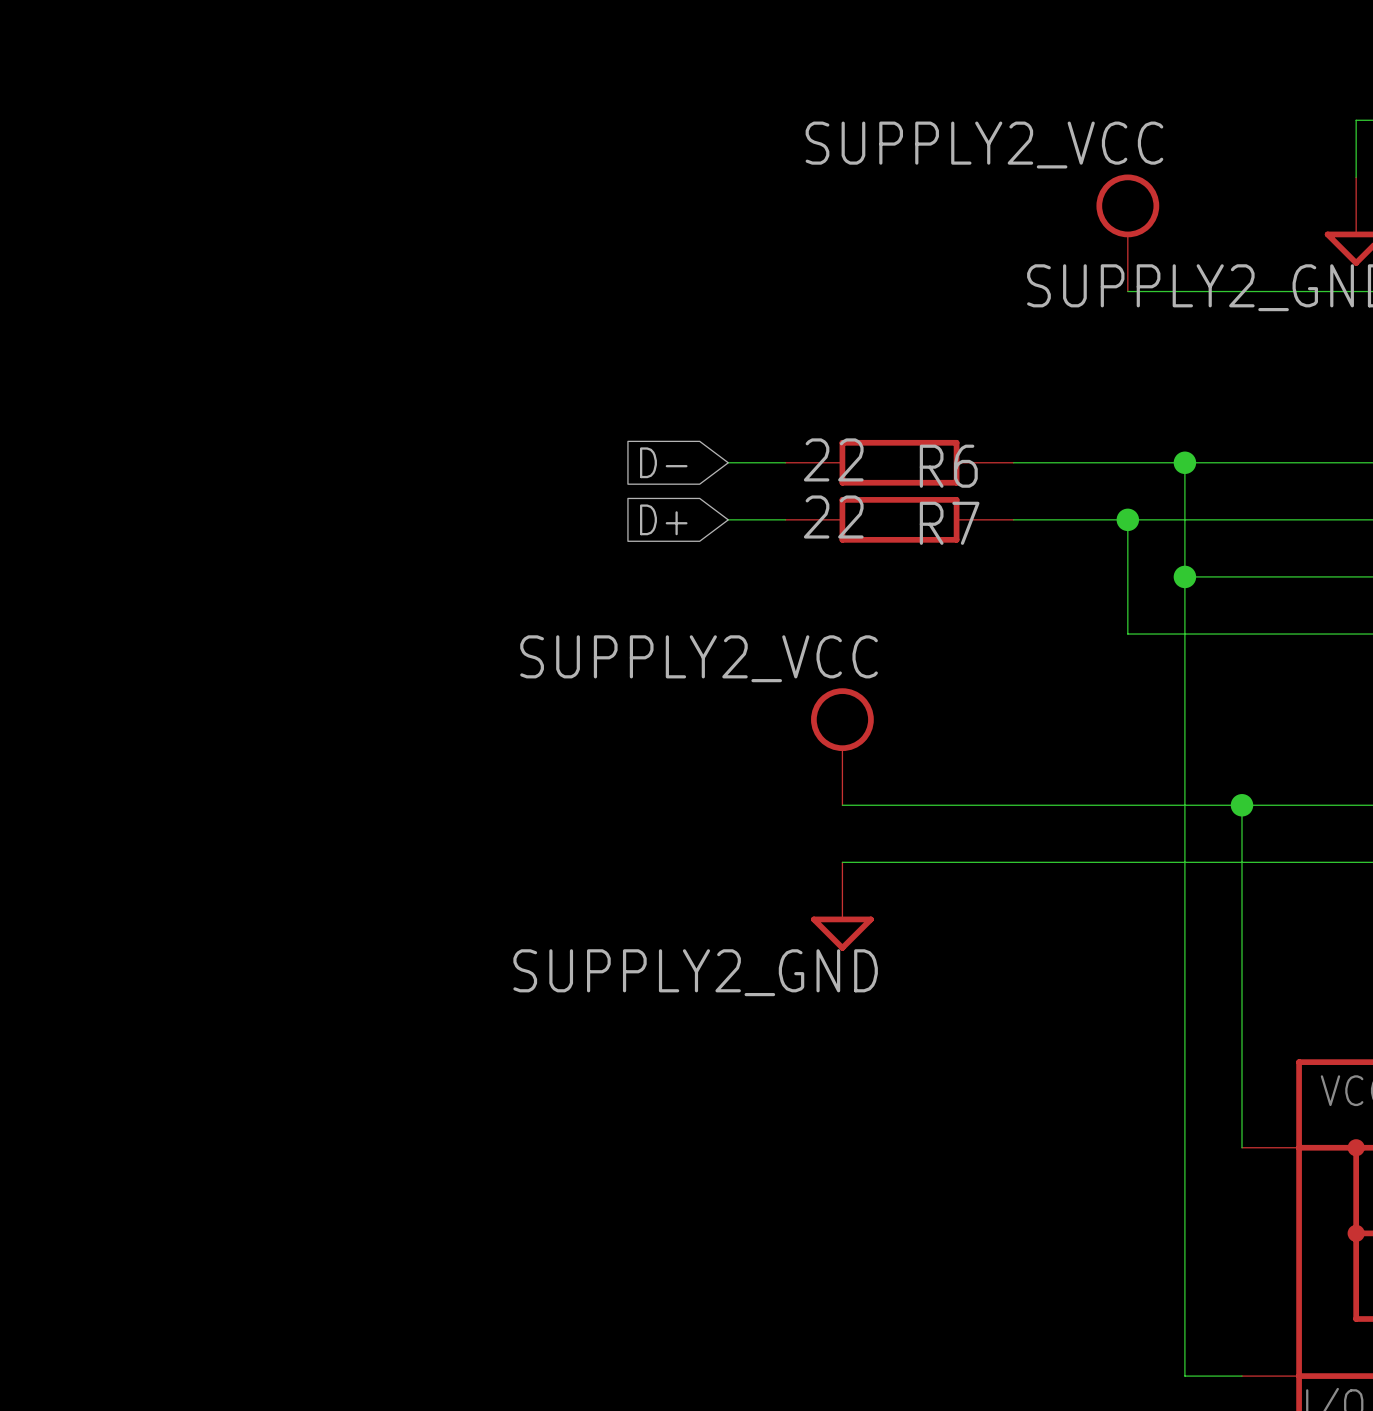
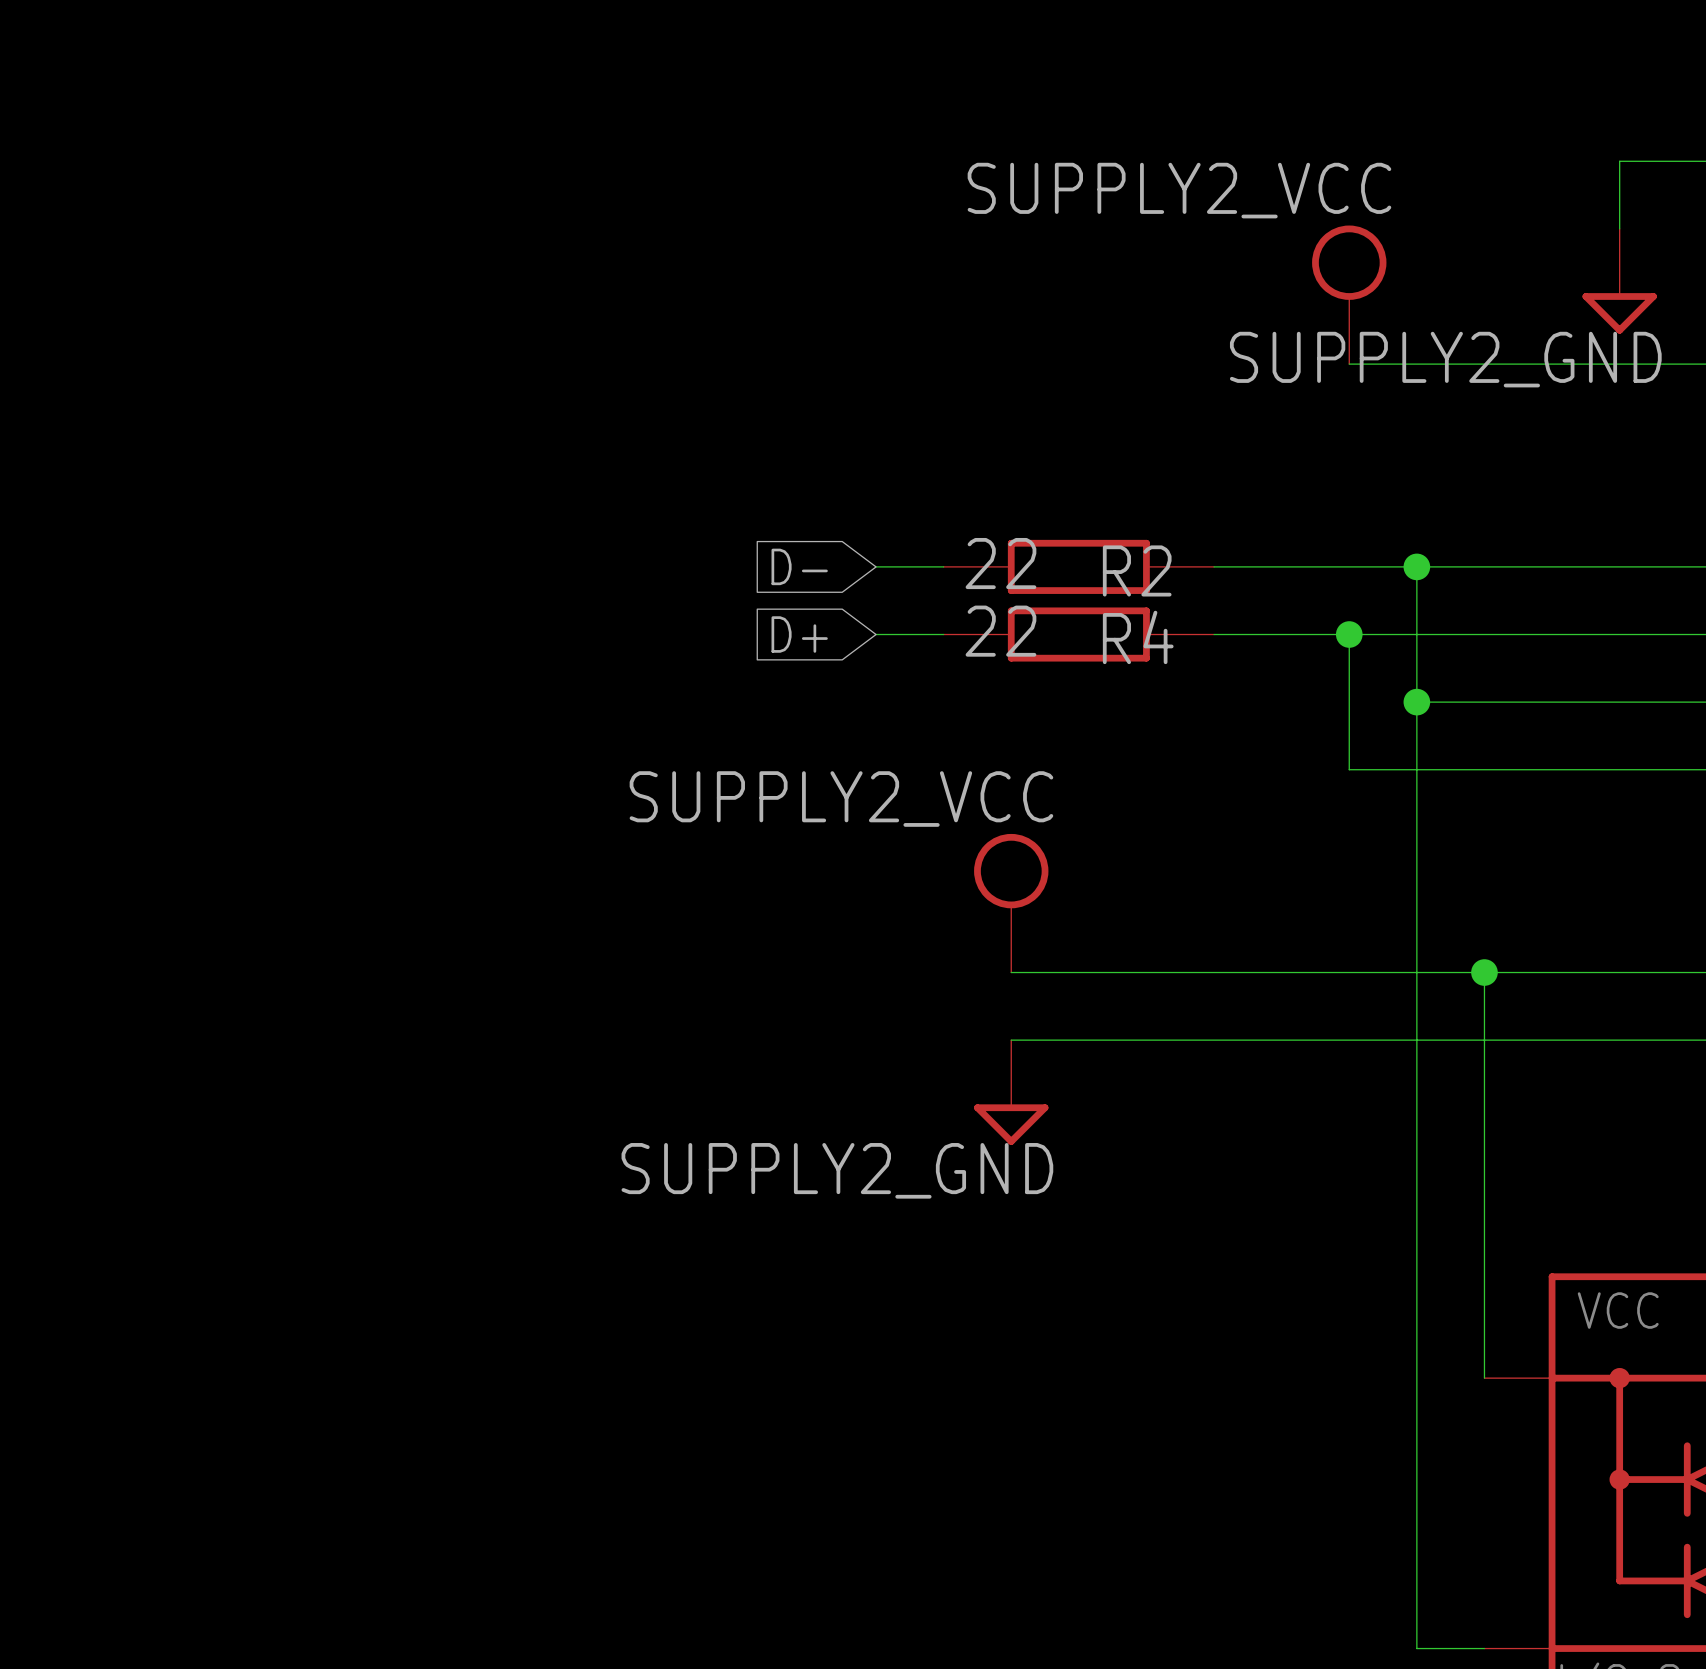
R6 name: R6 (948, 466) -> R2 (1137, 570)
R7 name: R7 (949, 523) -> R4 (1138, 637)

